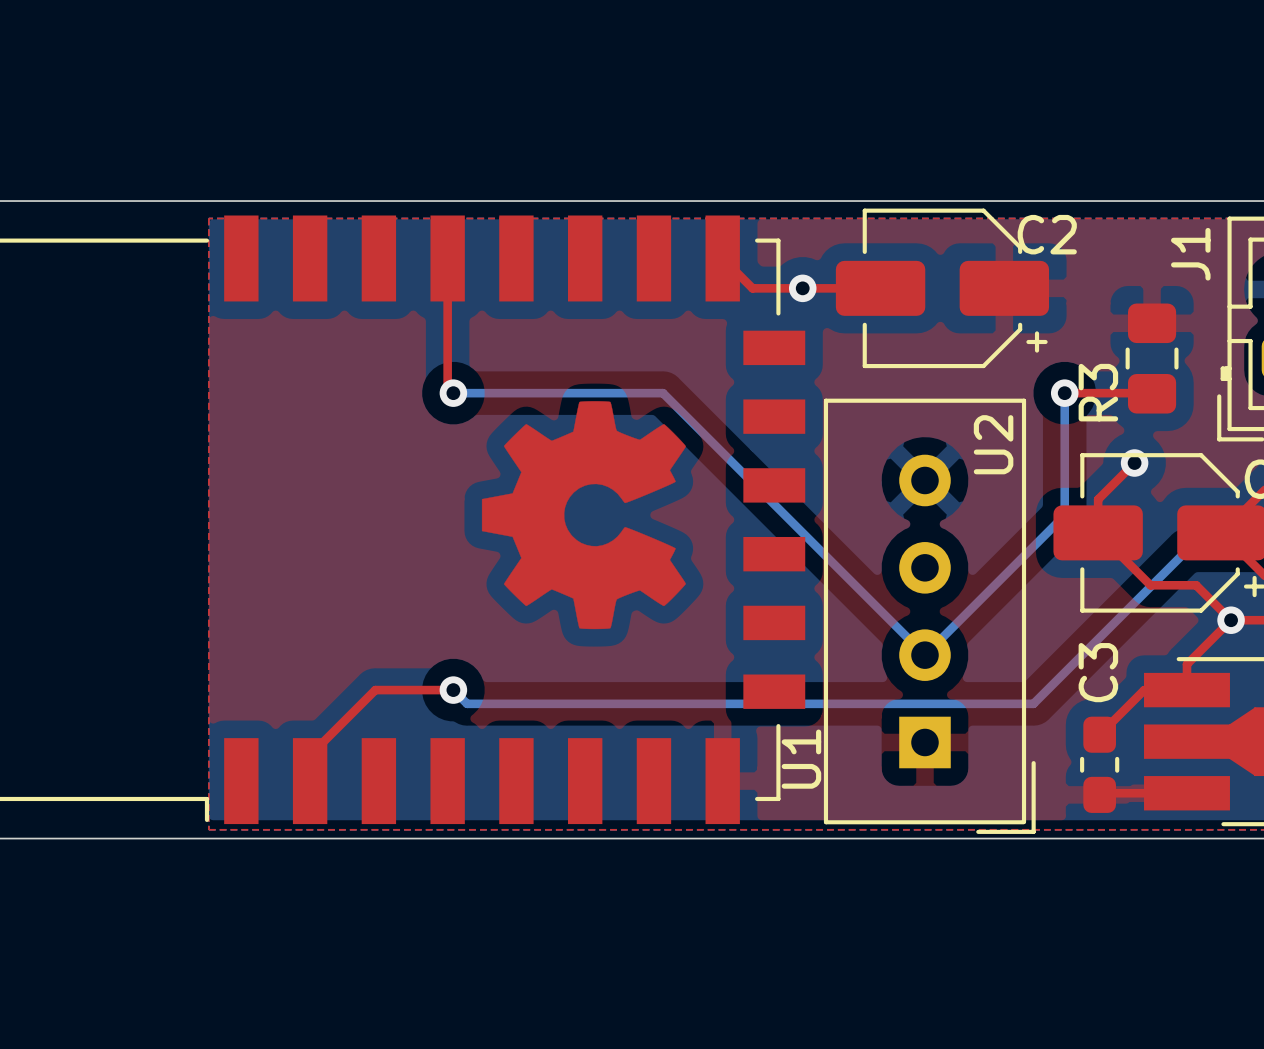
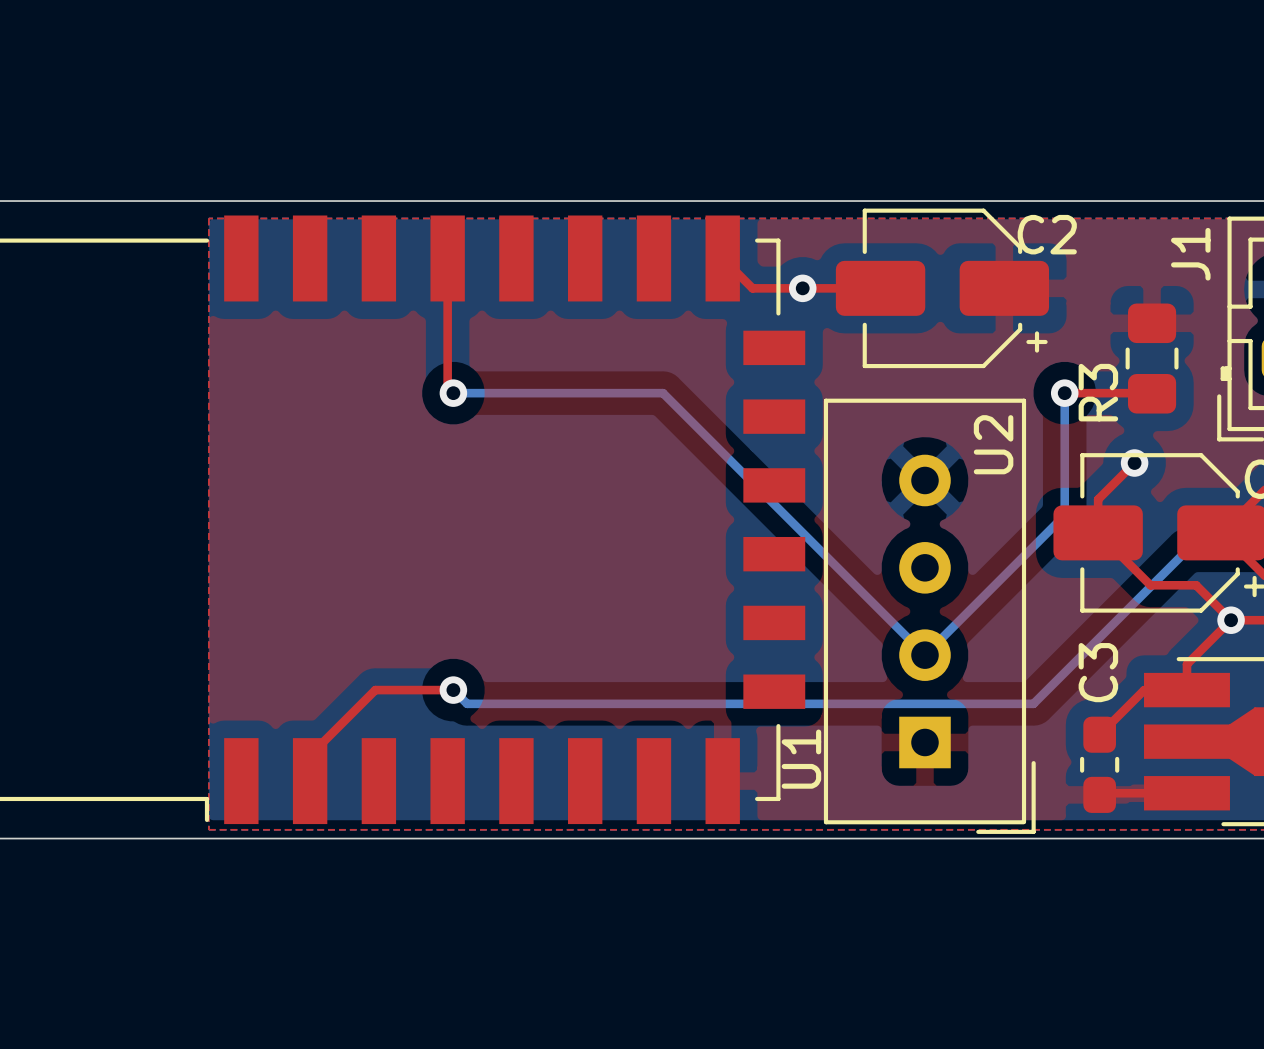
drawing: [481, 401, 686, 630] -> none

